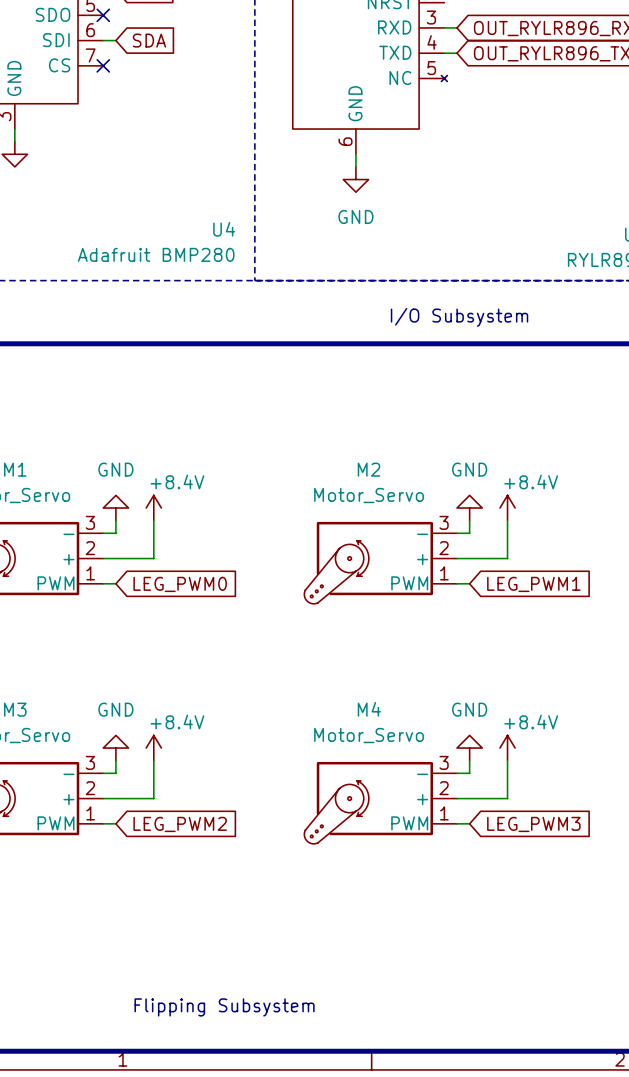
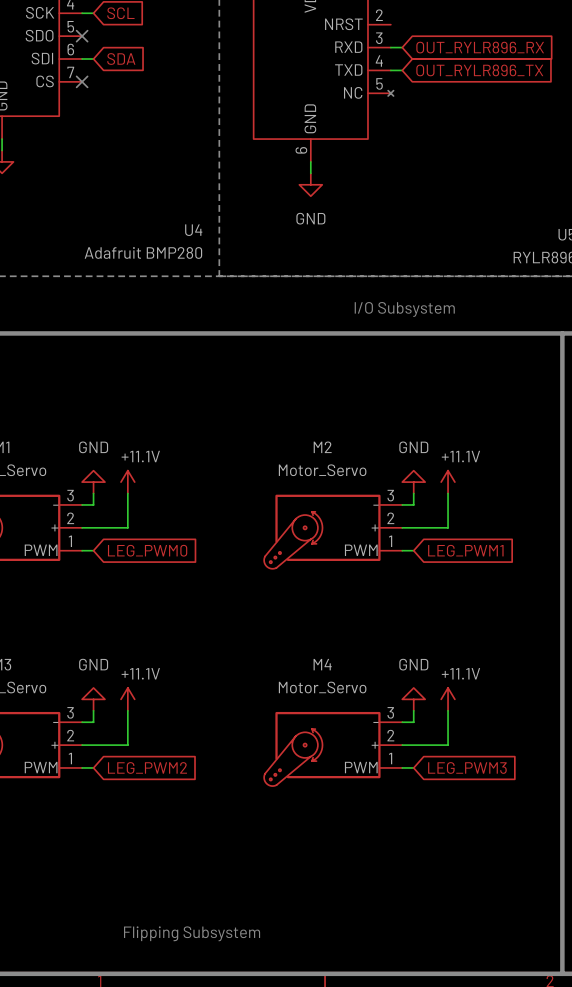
power symbol: +8.4V (153, 508) -> +11.1V (127, 482)
power symbol: +8.4V (507, 508) -> +11.1V (448, 482)
power symbol: +8.4V (153, 748) -> +11.1V (127, 699)
power symbol: +8.4V (507, 748) -> +11.1V (448, 699)

